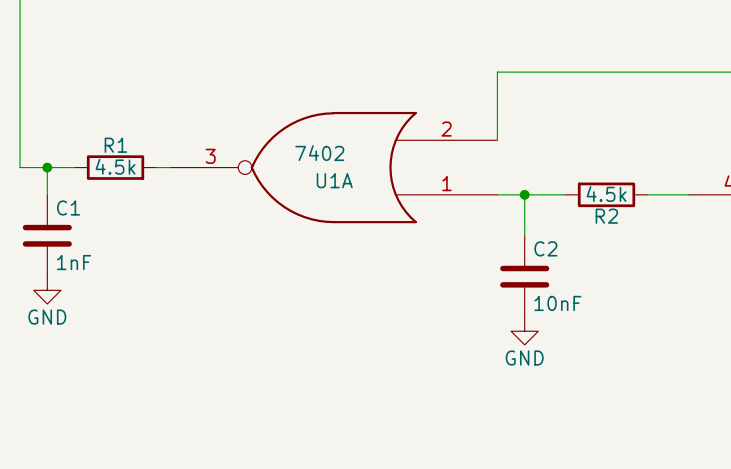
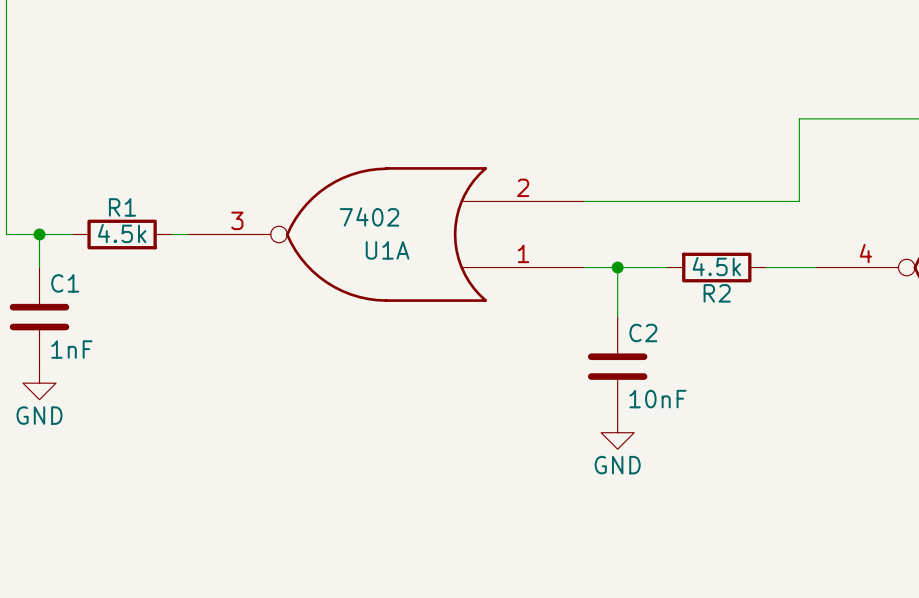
wire: (674, 72) (497, 72) (497, 140) -> (799, 118) (799, 201) (584, 201)

